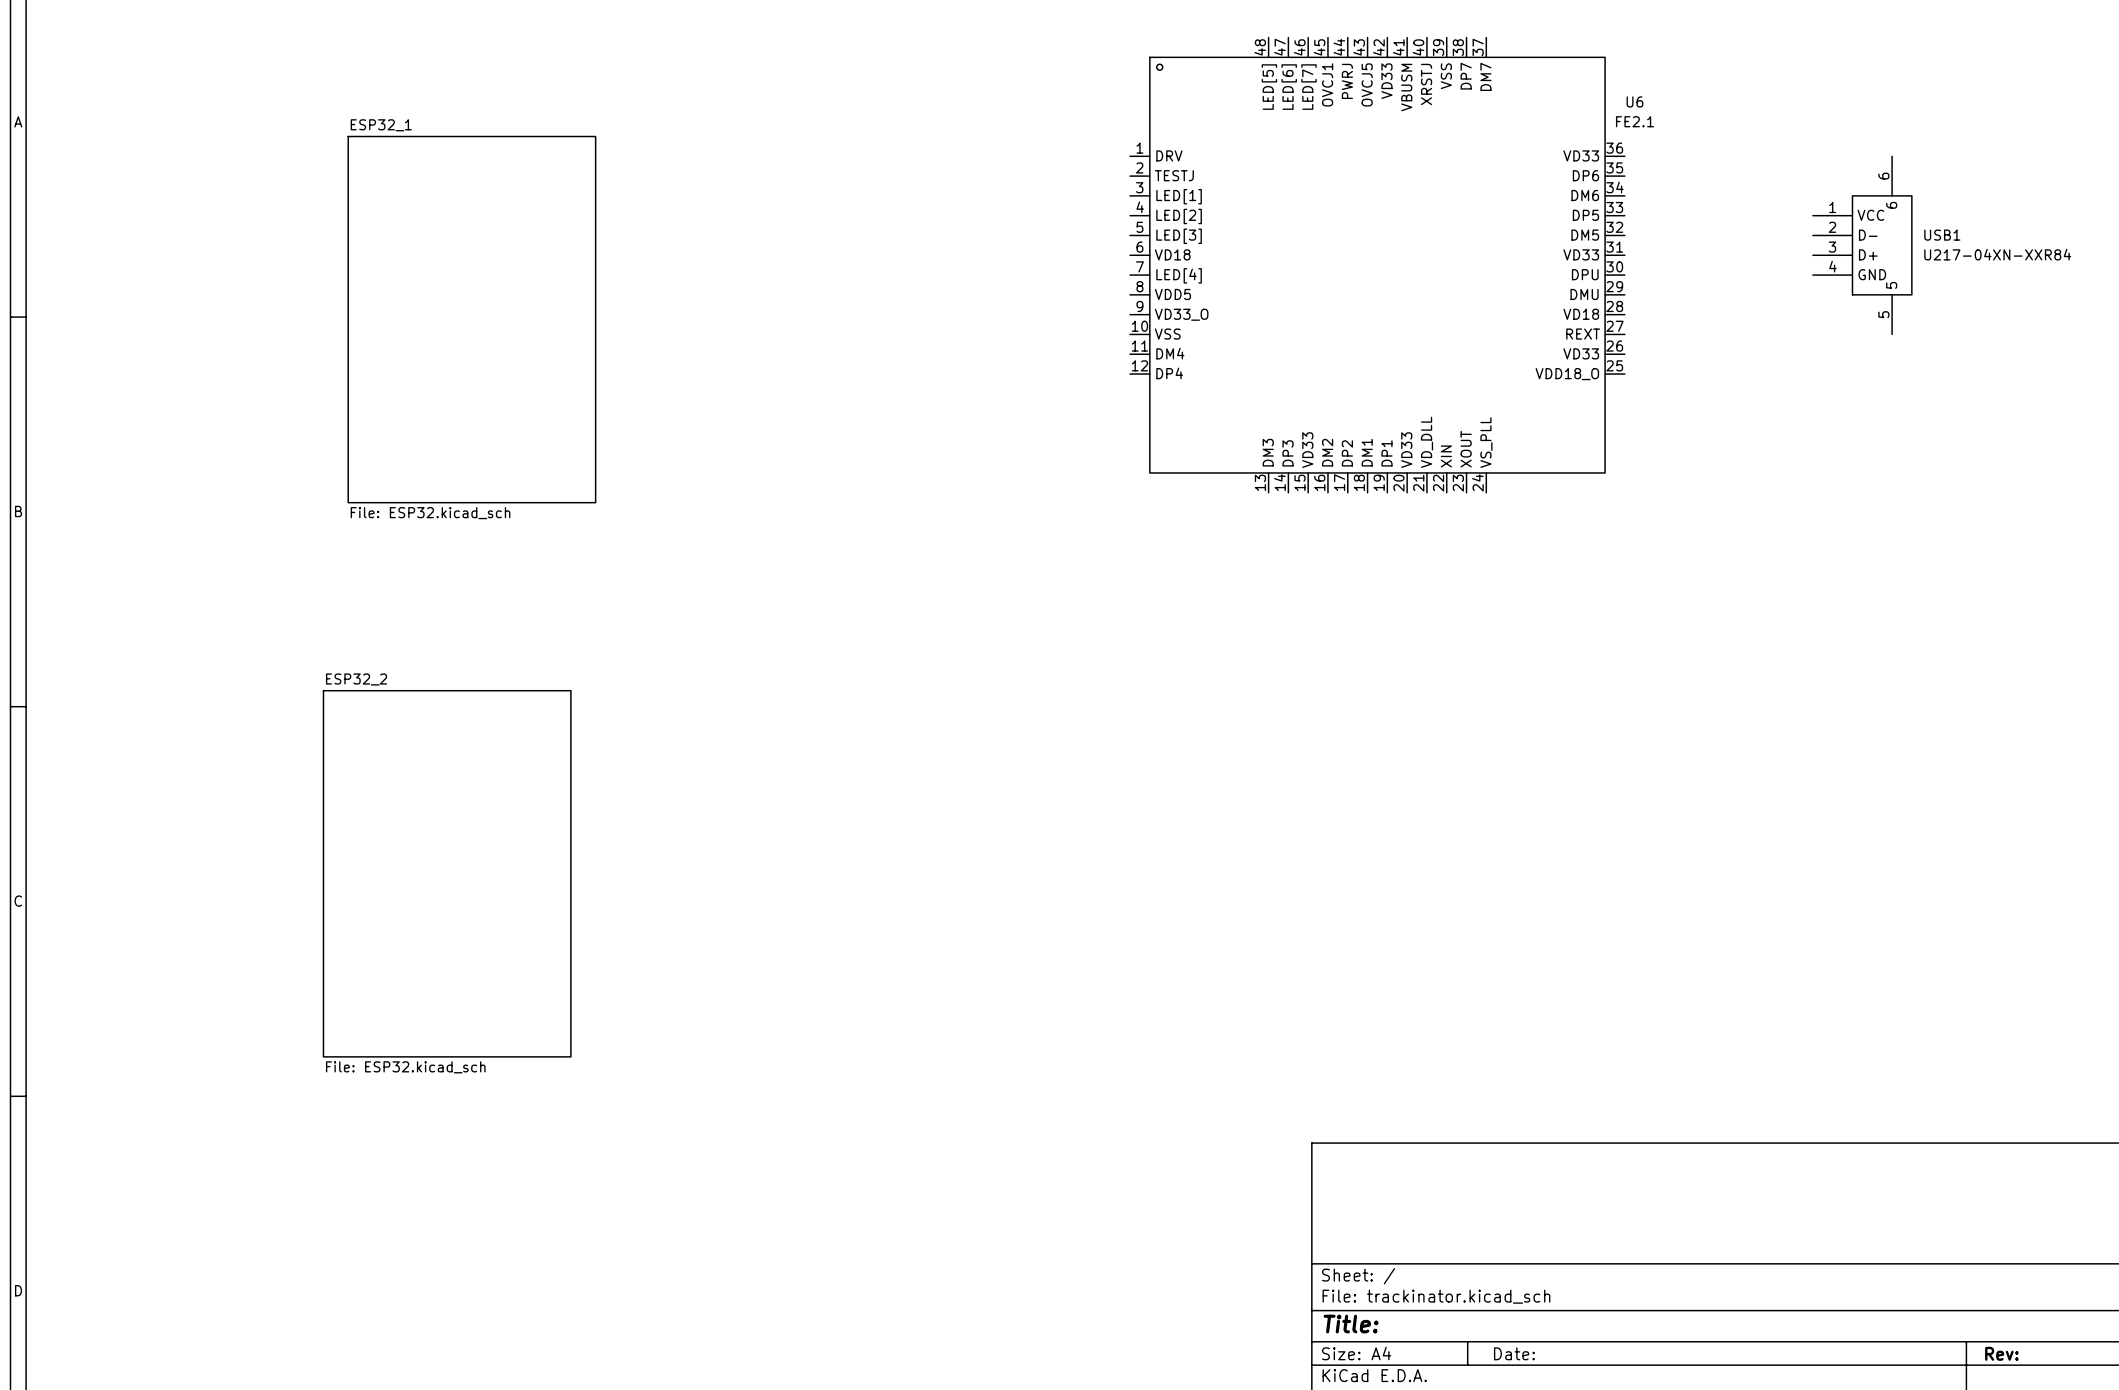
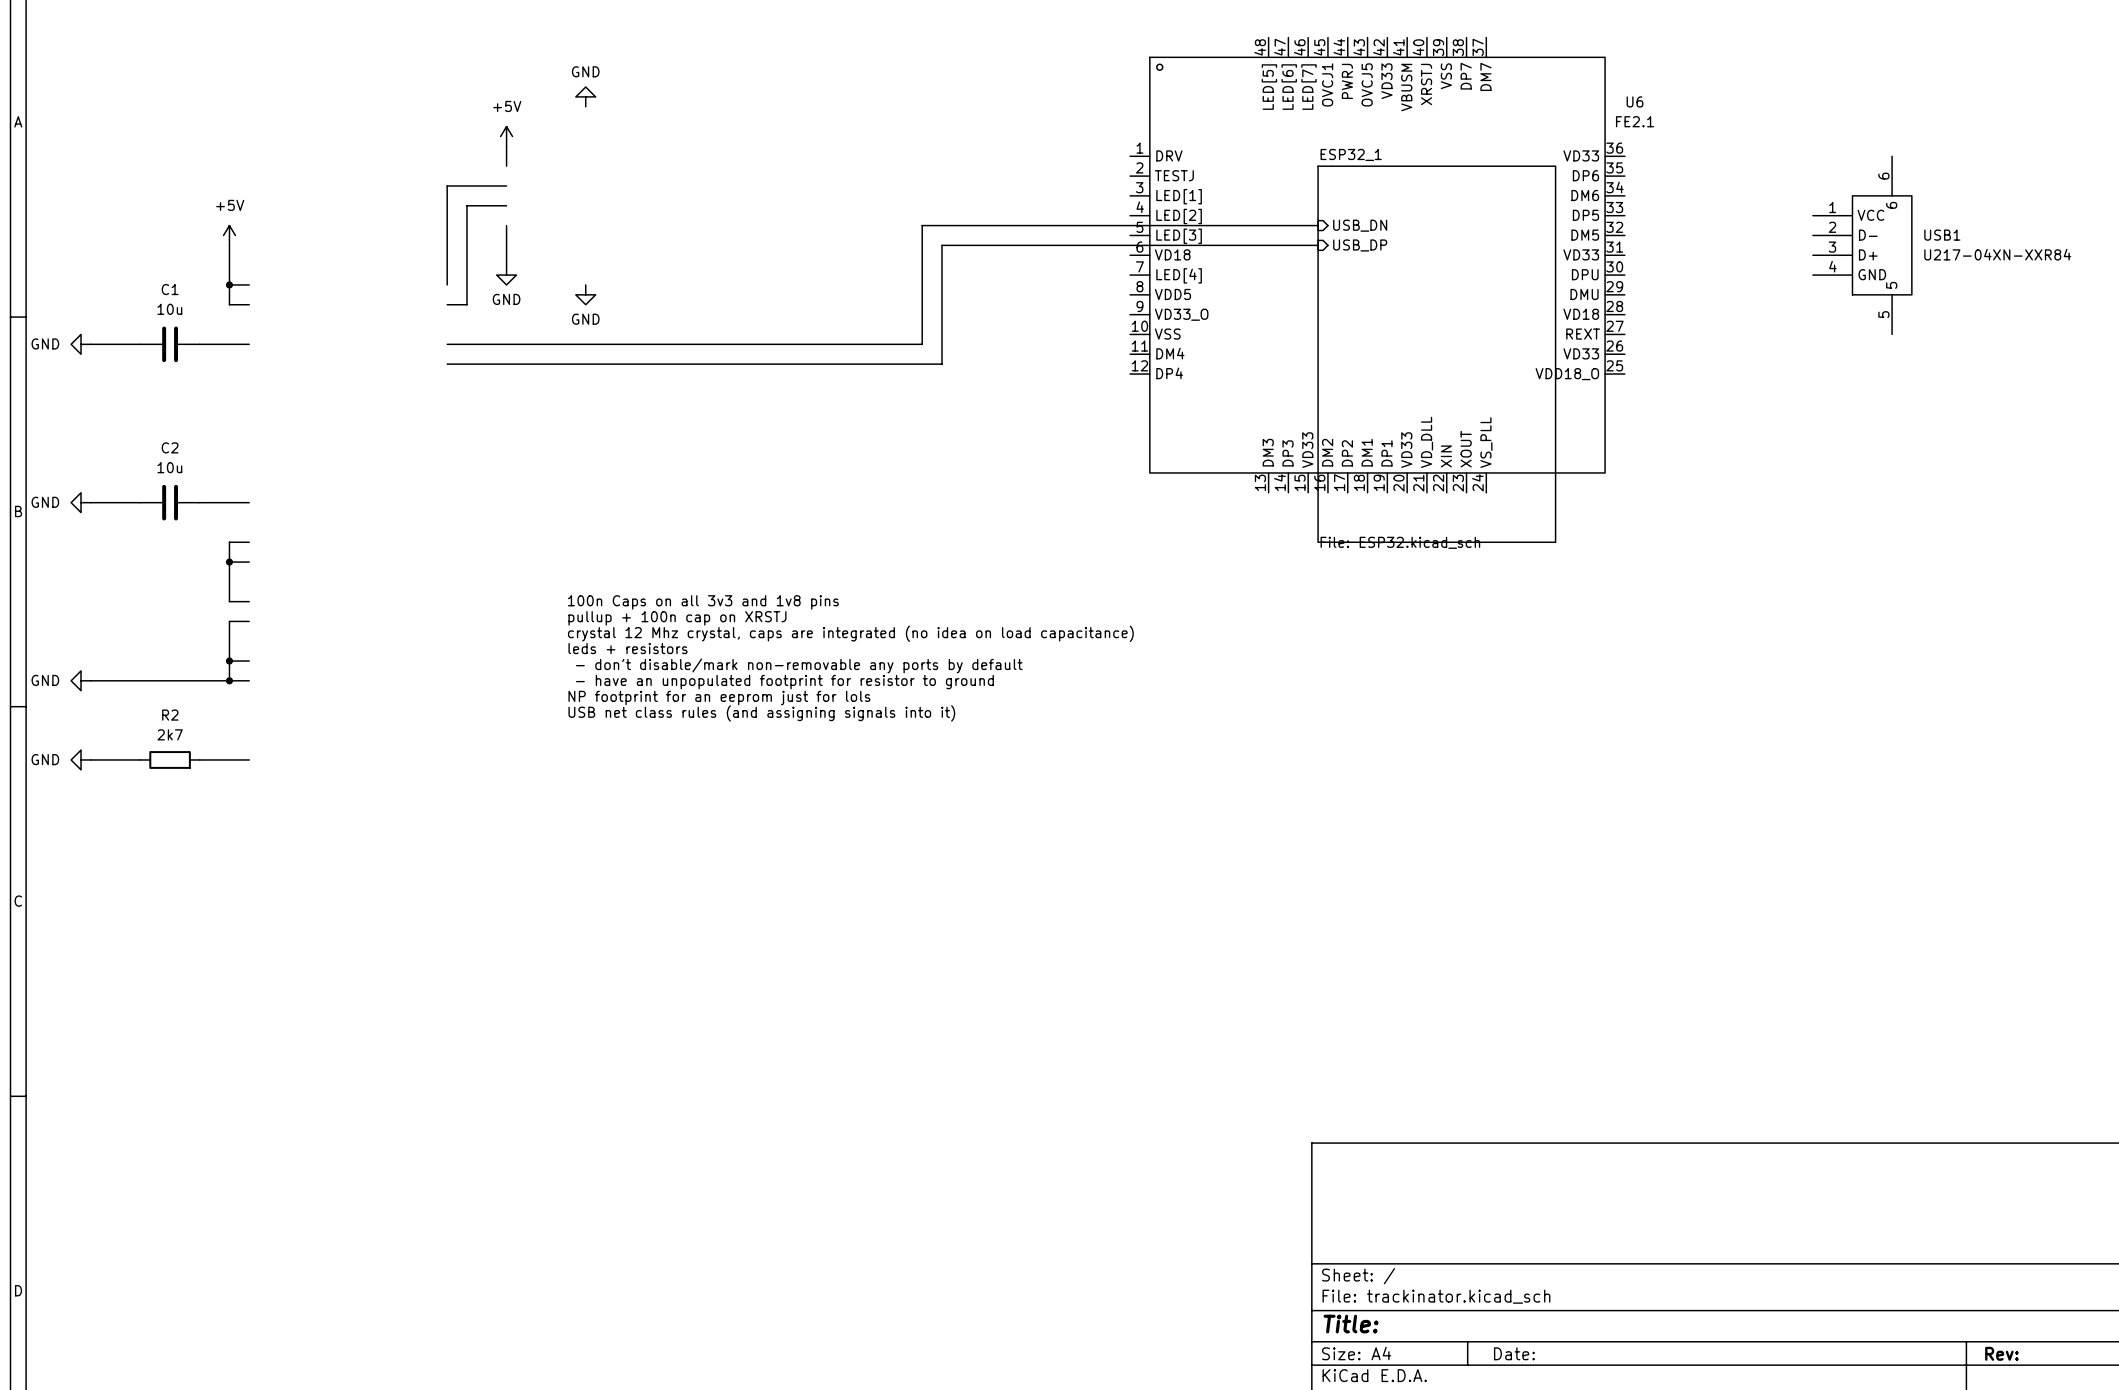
power symbol: none -> GND (585, 96)
sheet ESP32_1 shape: [347, 135, 597, 504] -> [1317, 165, 1557, 543]
power symbol: none -> +5V (506, 136)
wire: none -> (506, 146) (506, 166)
wire: none -> (506, 185) (447, 185) (447, 284)
wire: none -> (506, 205) (466, 205) (466, 304) (447, 304)
wire: none -> (506, 225) (506, 265)
wire: none -> (1318, 225) (922, 225) (922, 344) (447, 344)
sheet pin: none -> USB_DN (1360, 225)
power symbol: none -> +5V (229, 235)
wire: none -> (229, 245) (229, 304) (249, 304)
wire: none -> (1318, 245) (942, 245) (942, 364) (447, 364)
sheet pin: none -> USB_DP (1360, 245)
power symbol: none -> GND (506, 275)
wire: none -> (229, 284) (249, 284)
junction: none -> (229, 284)
power symbol: none -> GND (585, 294)
power symbol: none -> GND (81, 344)
wire: none -> (90, 344) (140, 344)
C1: none -> 10u (170, 344)
wire: none -> (199, 344) (249, 344)
power symbol: none -> GND (81, 502)
wire: none -> (90, 502) (140, 502)
C2: none -> 10u (170, 502)
wire: none -> (199, 502) (249, 502)
wire: none -> (249, 542) (229, 542) (229, 601) (249, 601)
wire: none -> (229, 562) (249, 562)
junction: none -> (229, 562)
text: none -> 100n Caps on all 3v3 and 1v8 pins (703, 602)
text: none -> pullup + 100n cap on XRSTJ (677, 618)
wire: none -> (249, 621) (229, 621) (229, 680)
text: none -> crystal 12 Mhz crystal, caps are integrated (no idea on load capacitance) (850, 633)
text: none -> leds + resistors (627, 648)
wire: none -> (229, 661) (249, 661)
junction: none -> (229, 661)
text: none -> - don't disable/mark non-removable any ports by default (799, 665)
power symbol: none -> GND (81, 680)
wire: none -> (90, 680) (249, 680)
junction: none -> (229, 680)
text: none -> - have an unpopulated footprint for resistor to ground (784, 682)
text: none -> NP footprint for an eeprom just for lols (719, 698)
text: none -> USB net class rules (and assigning signals into it) (761, 713)
power symbol: none -> GND (81, 759)
wire: none -> (90, 759) (140, 759)
R2: none -> 2k7 (170, 759)
wire: none -> (199, 759) (249, 759)
sheet ESP32_2: File: ESP32.kicad_sch (447, 873) -> none

